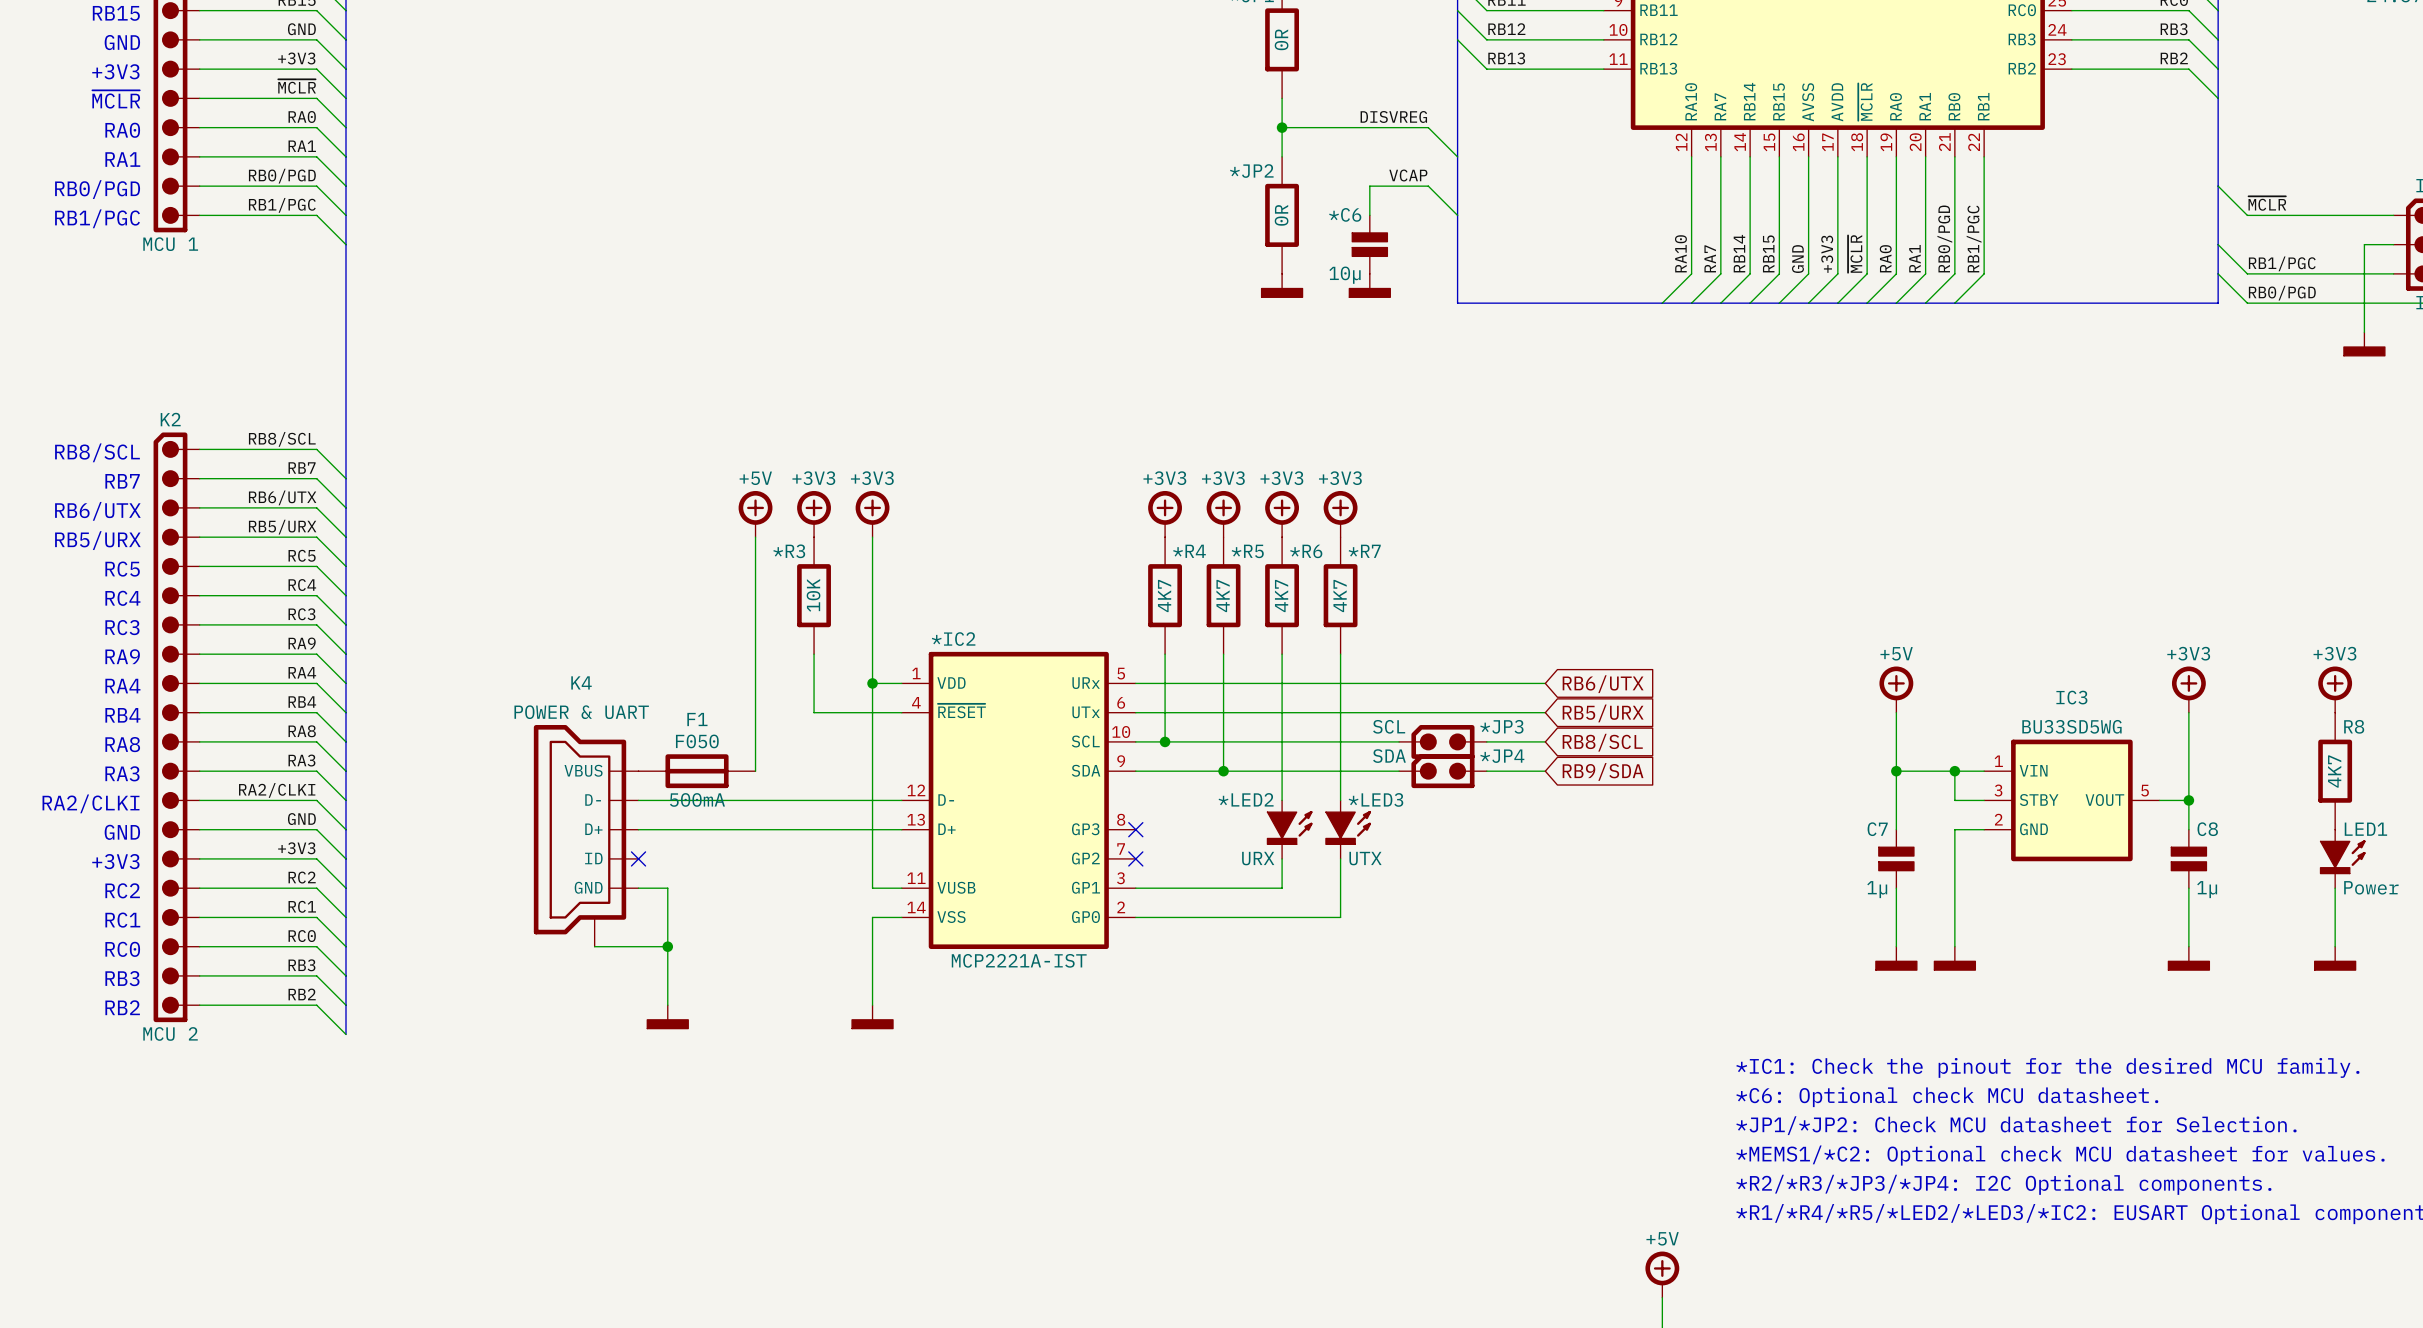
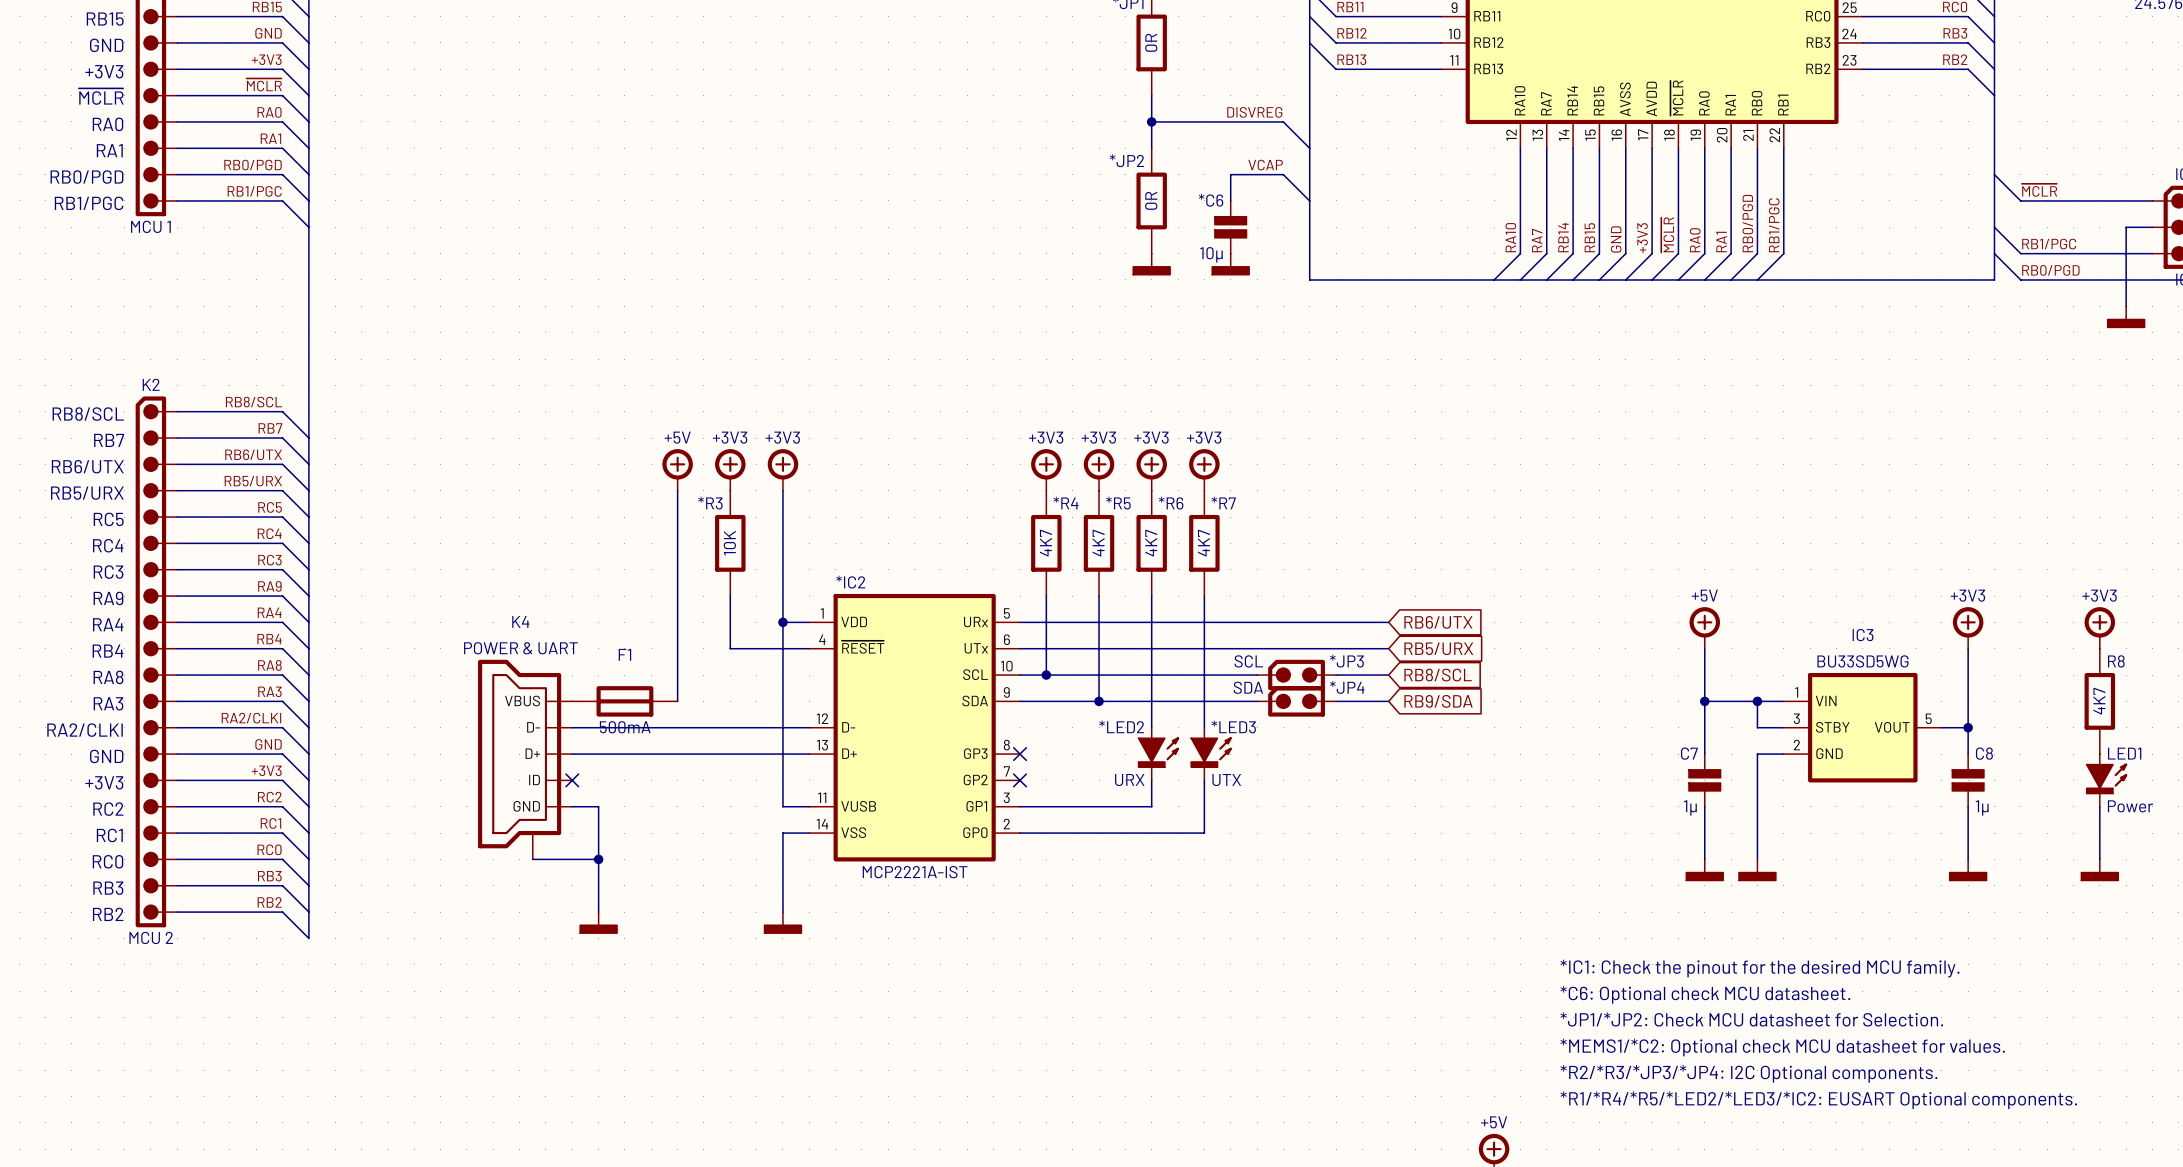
F1 value: F050 (697, 741) -> none

